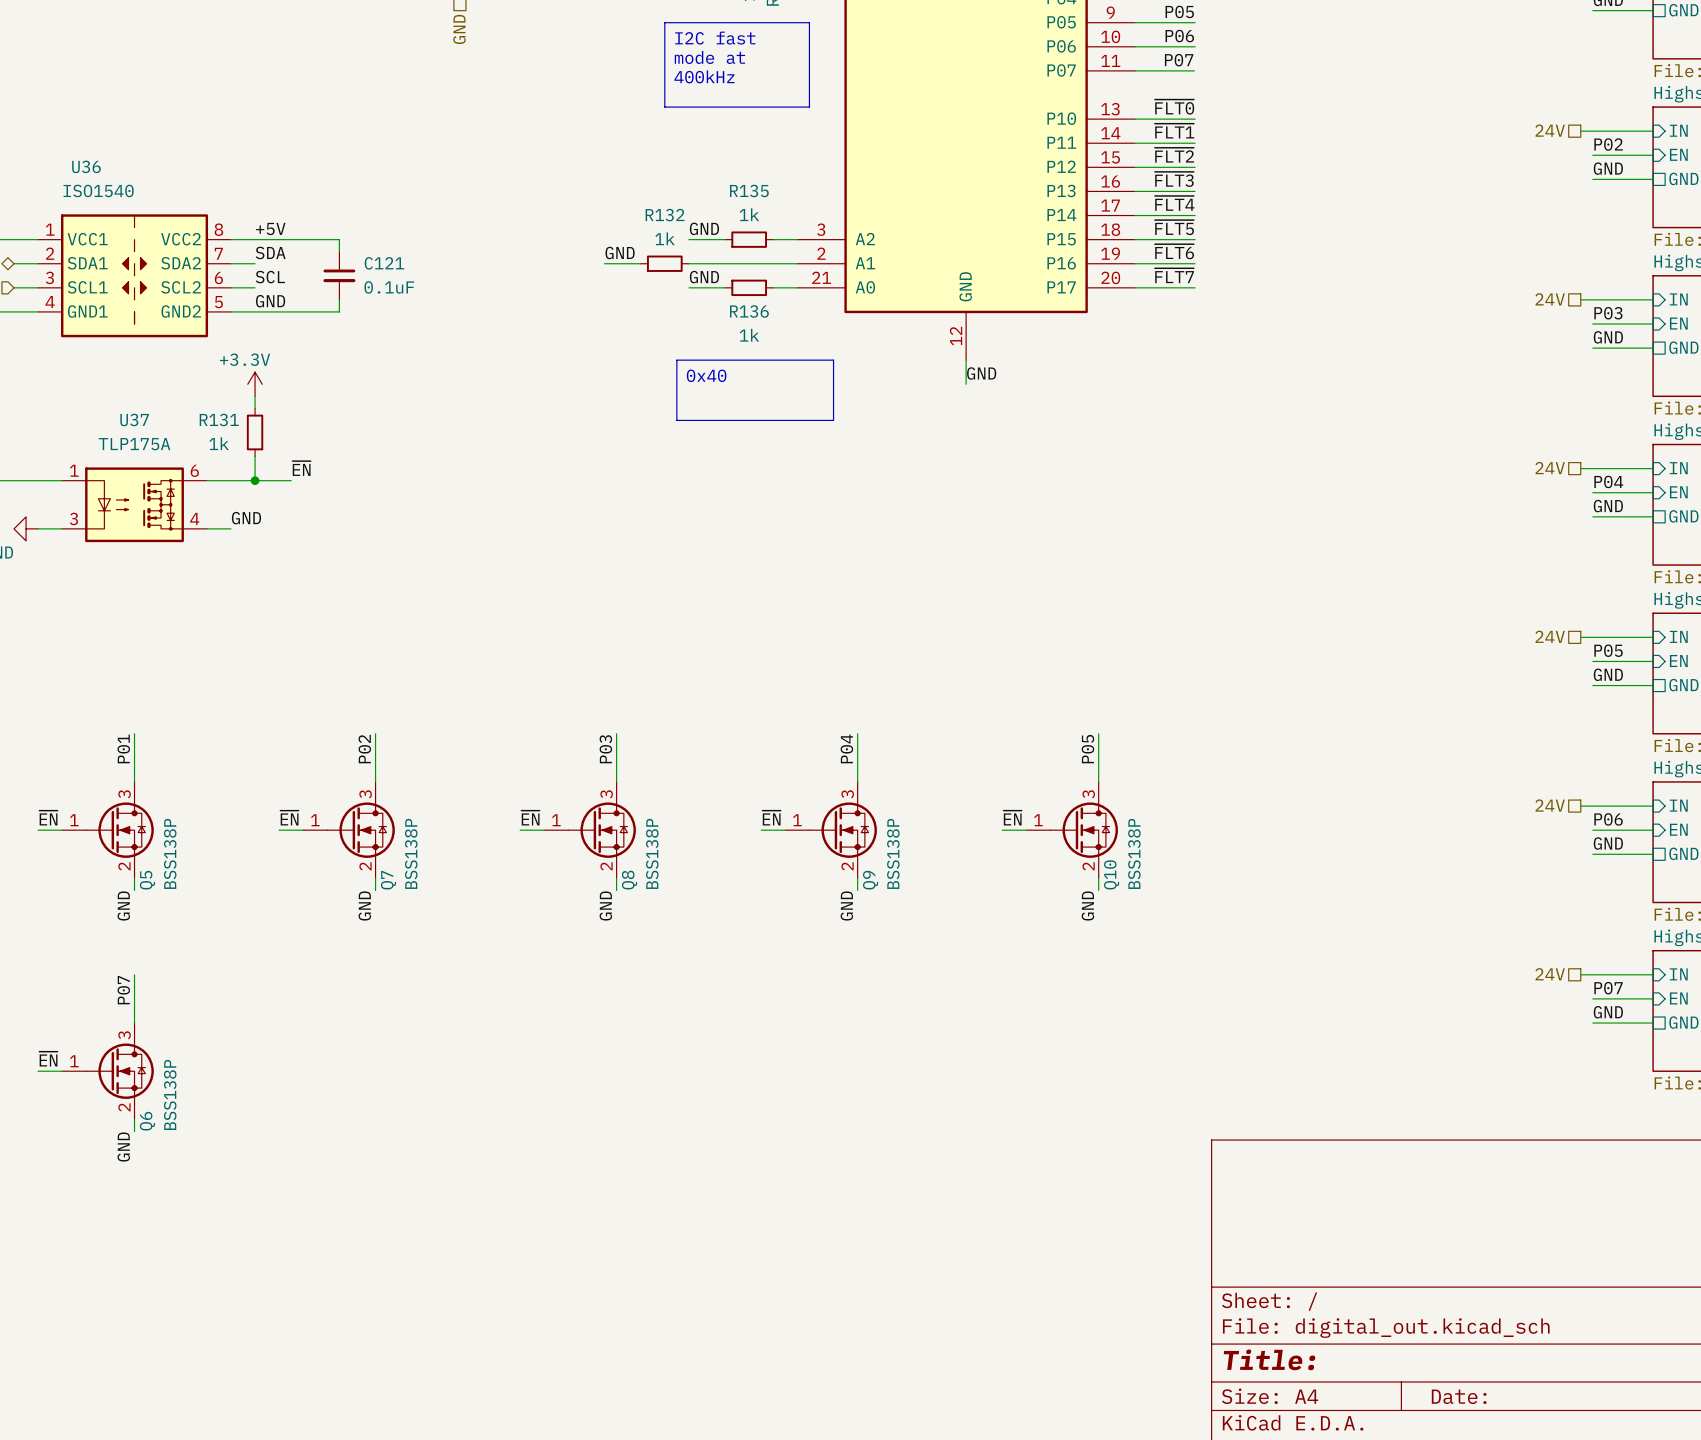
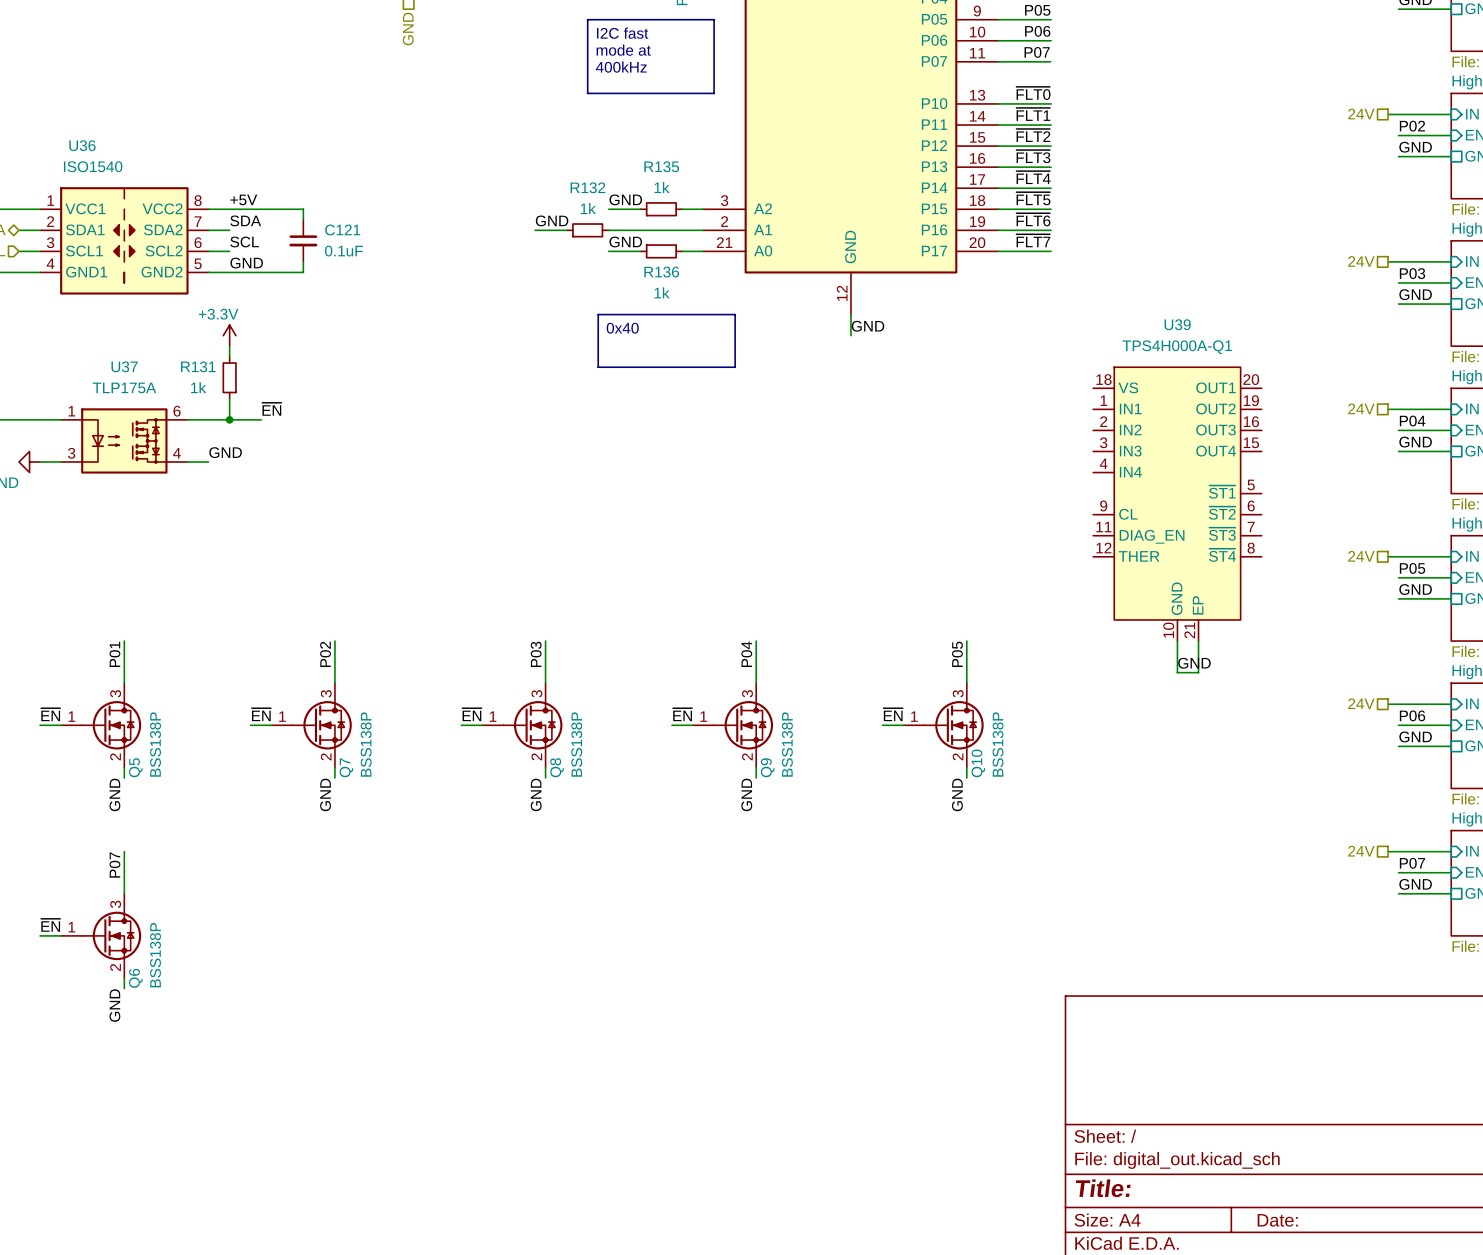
U39: none -> TPS4H000A-Q1 (1177, 504)
wire: none -> (1177, 641) (1177, 672) (1198, 672) (1198, 641)
label: none -> GND (1194, 663)

